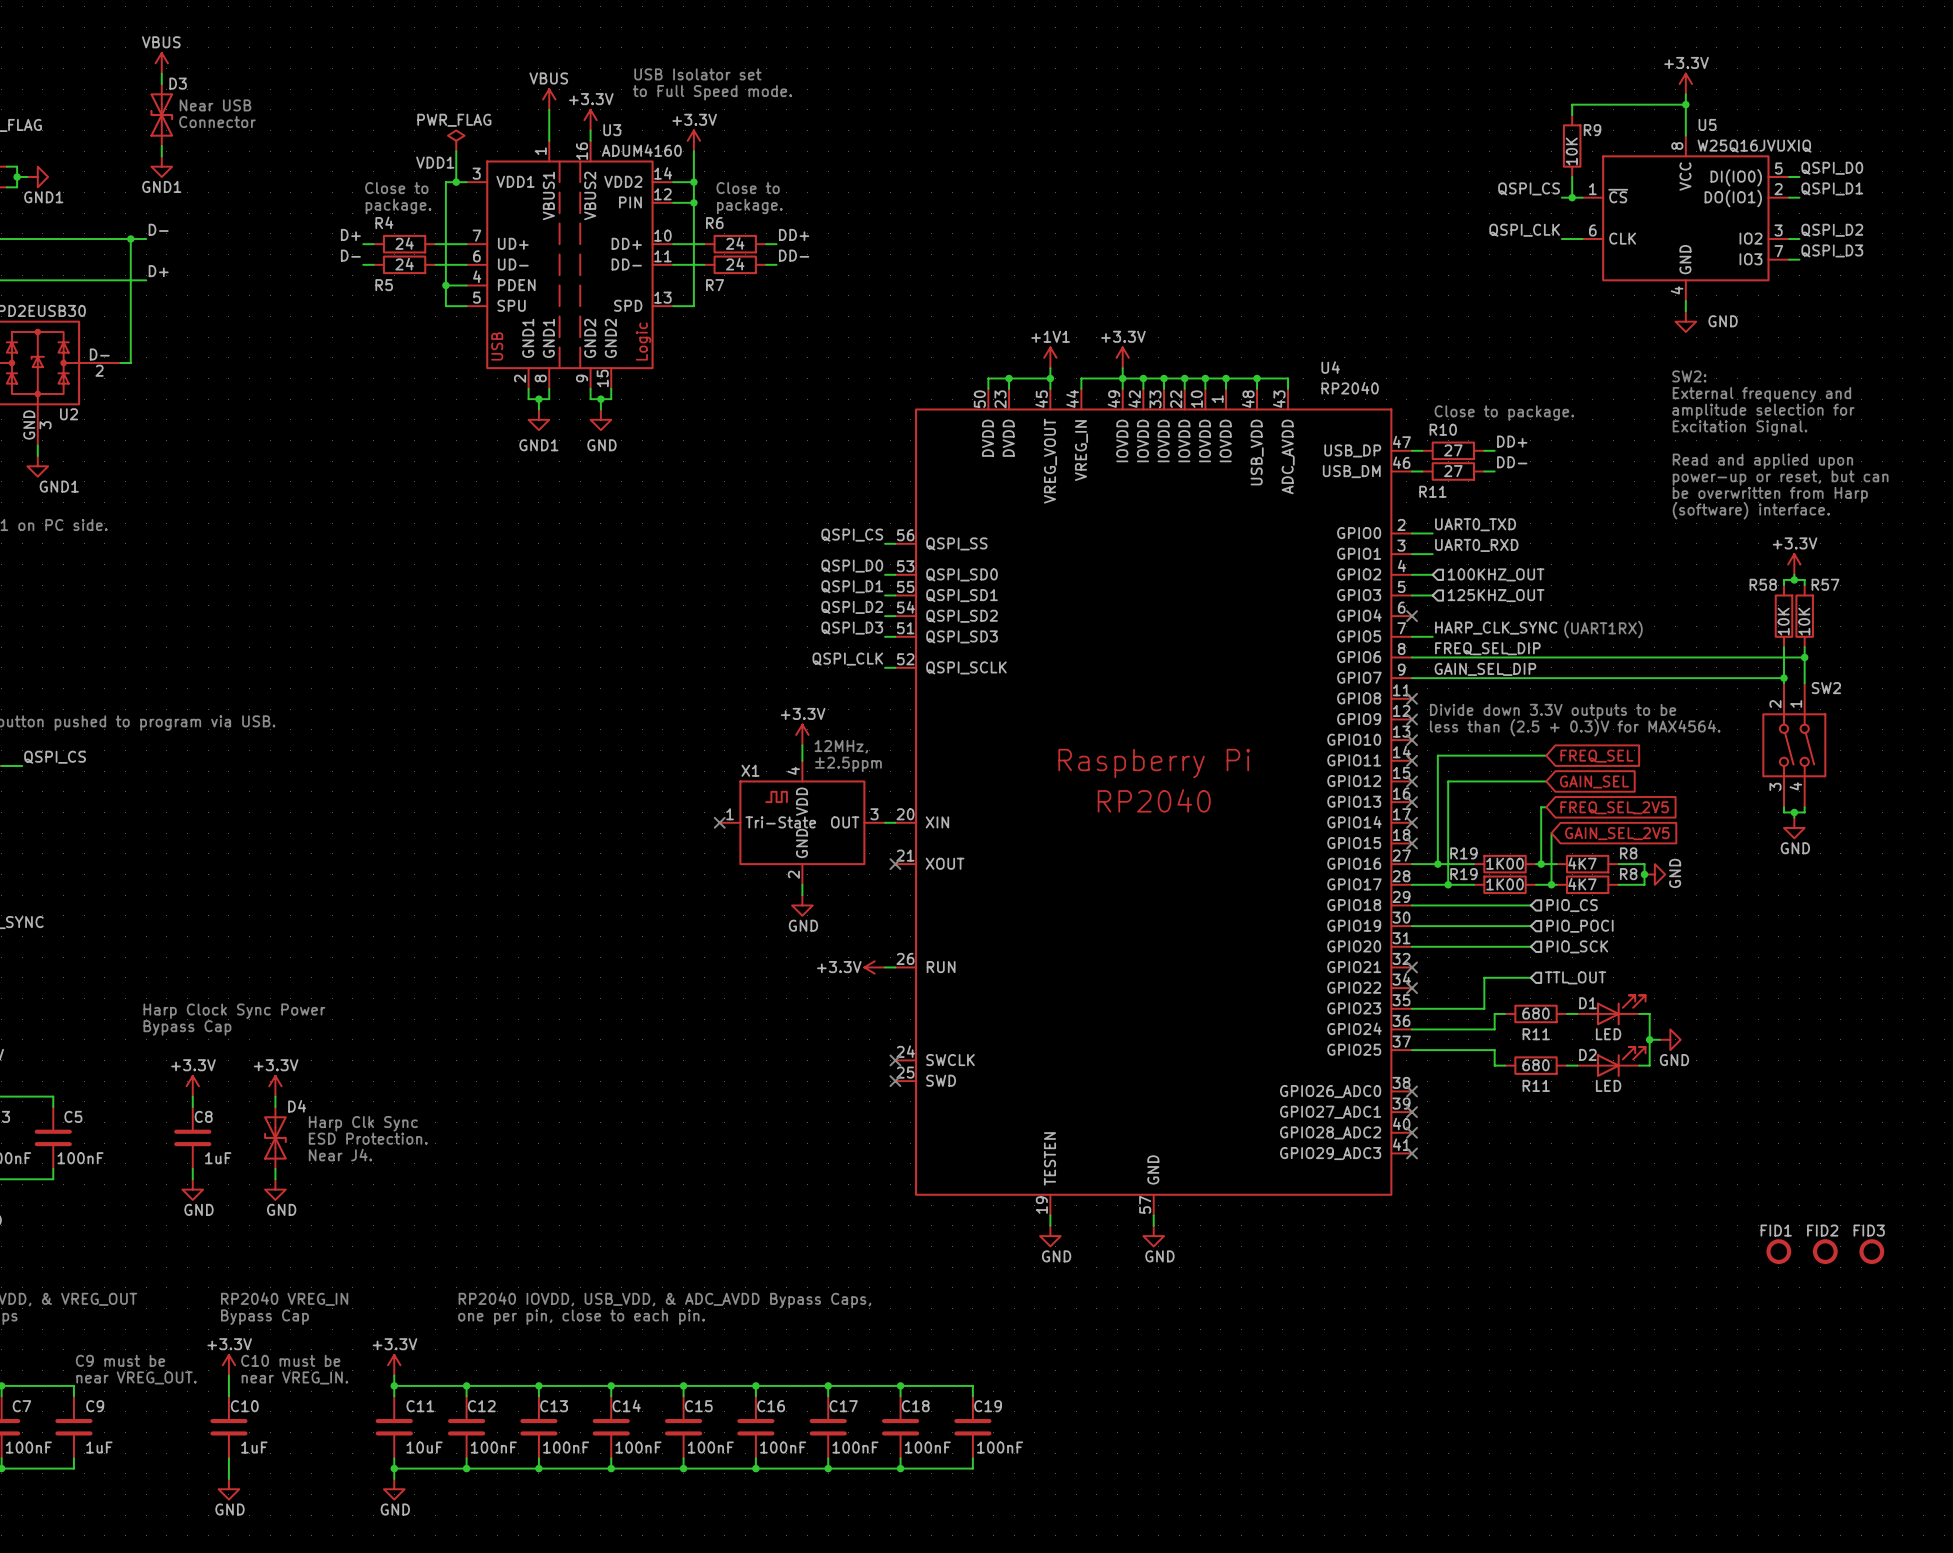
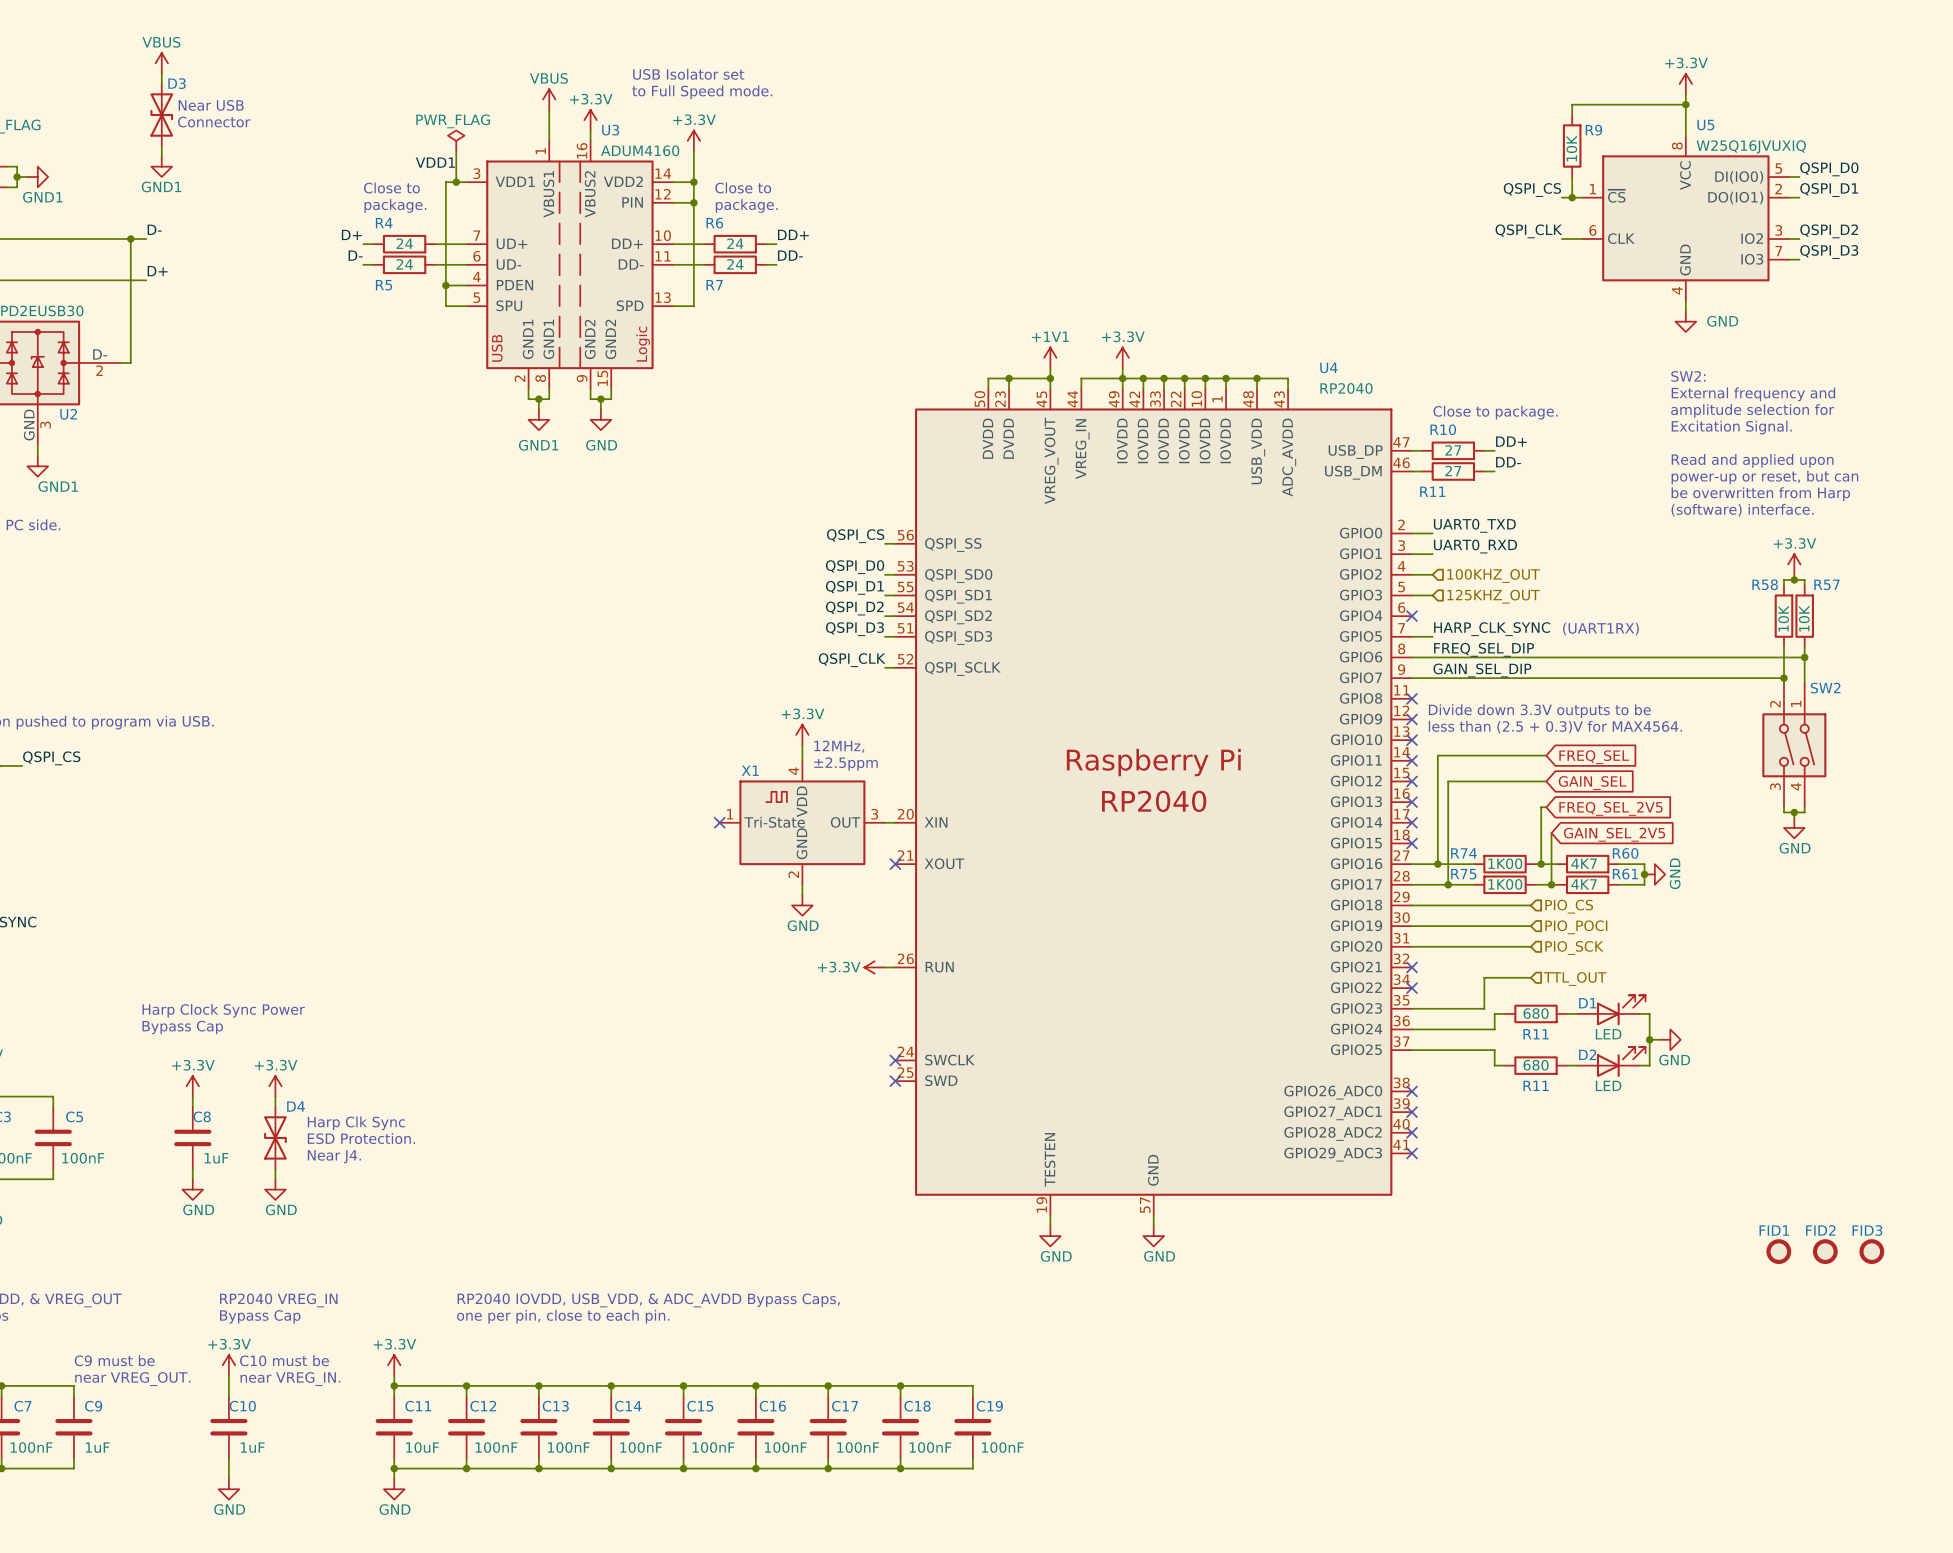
R19 name: R19 (1463, 853) -> R74 (1463, 853)
R8 name: R8 (1628, 853) -> R60 (1625, 853)
R19 name: R19 (1463, 874) -> R75 (1463, 874)
R8 name: R8 (1628, 874) -> R61 (1625, 874)

